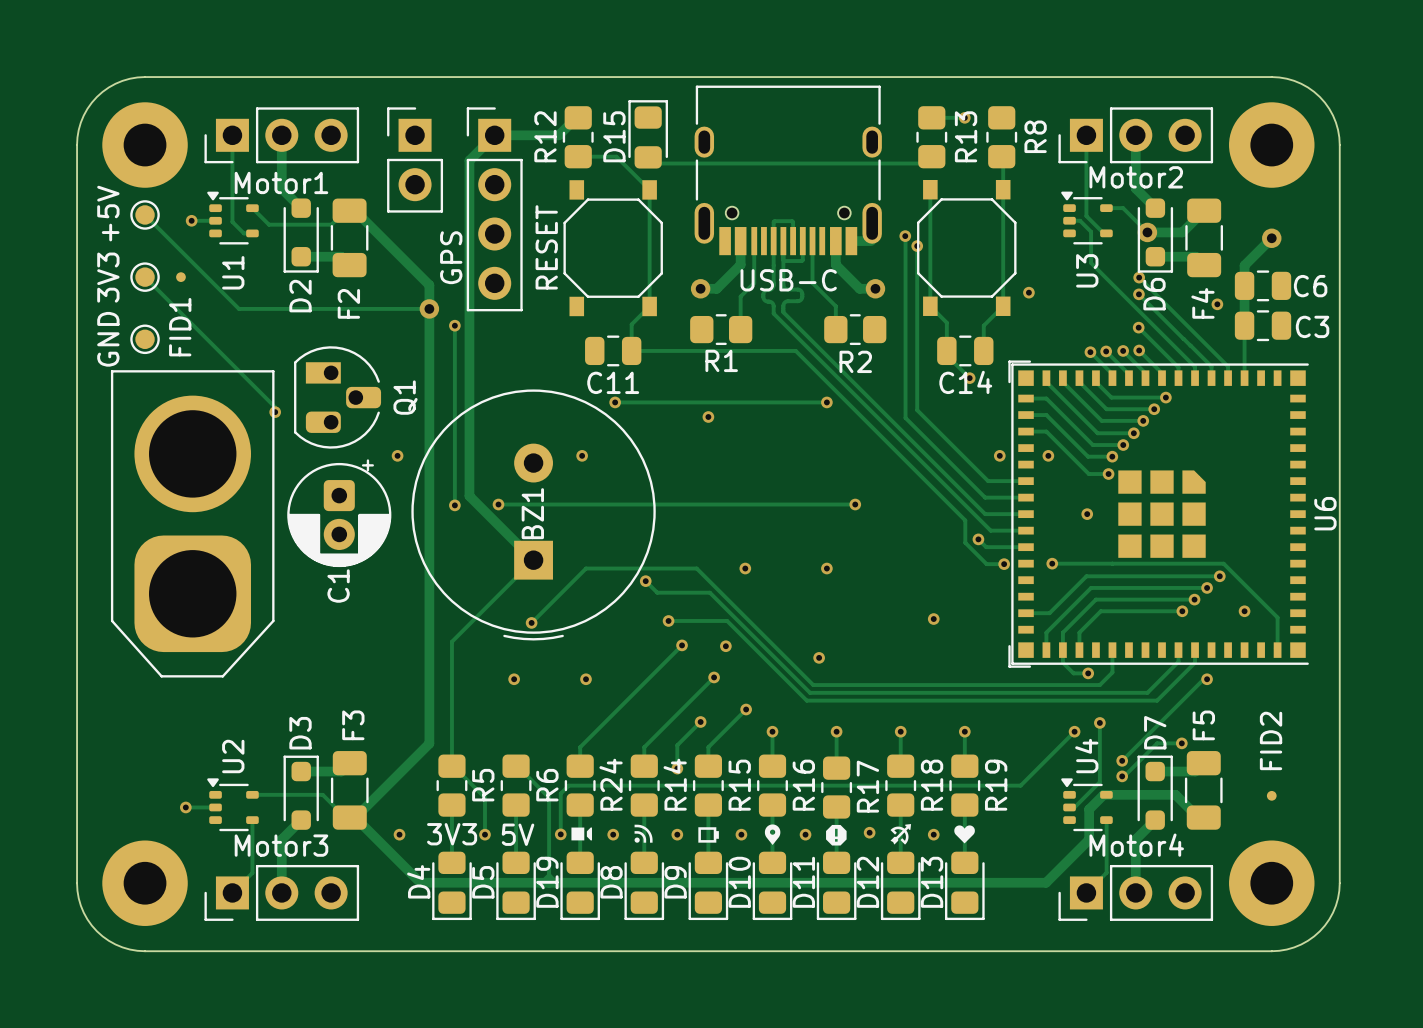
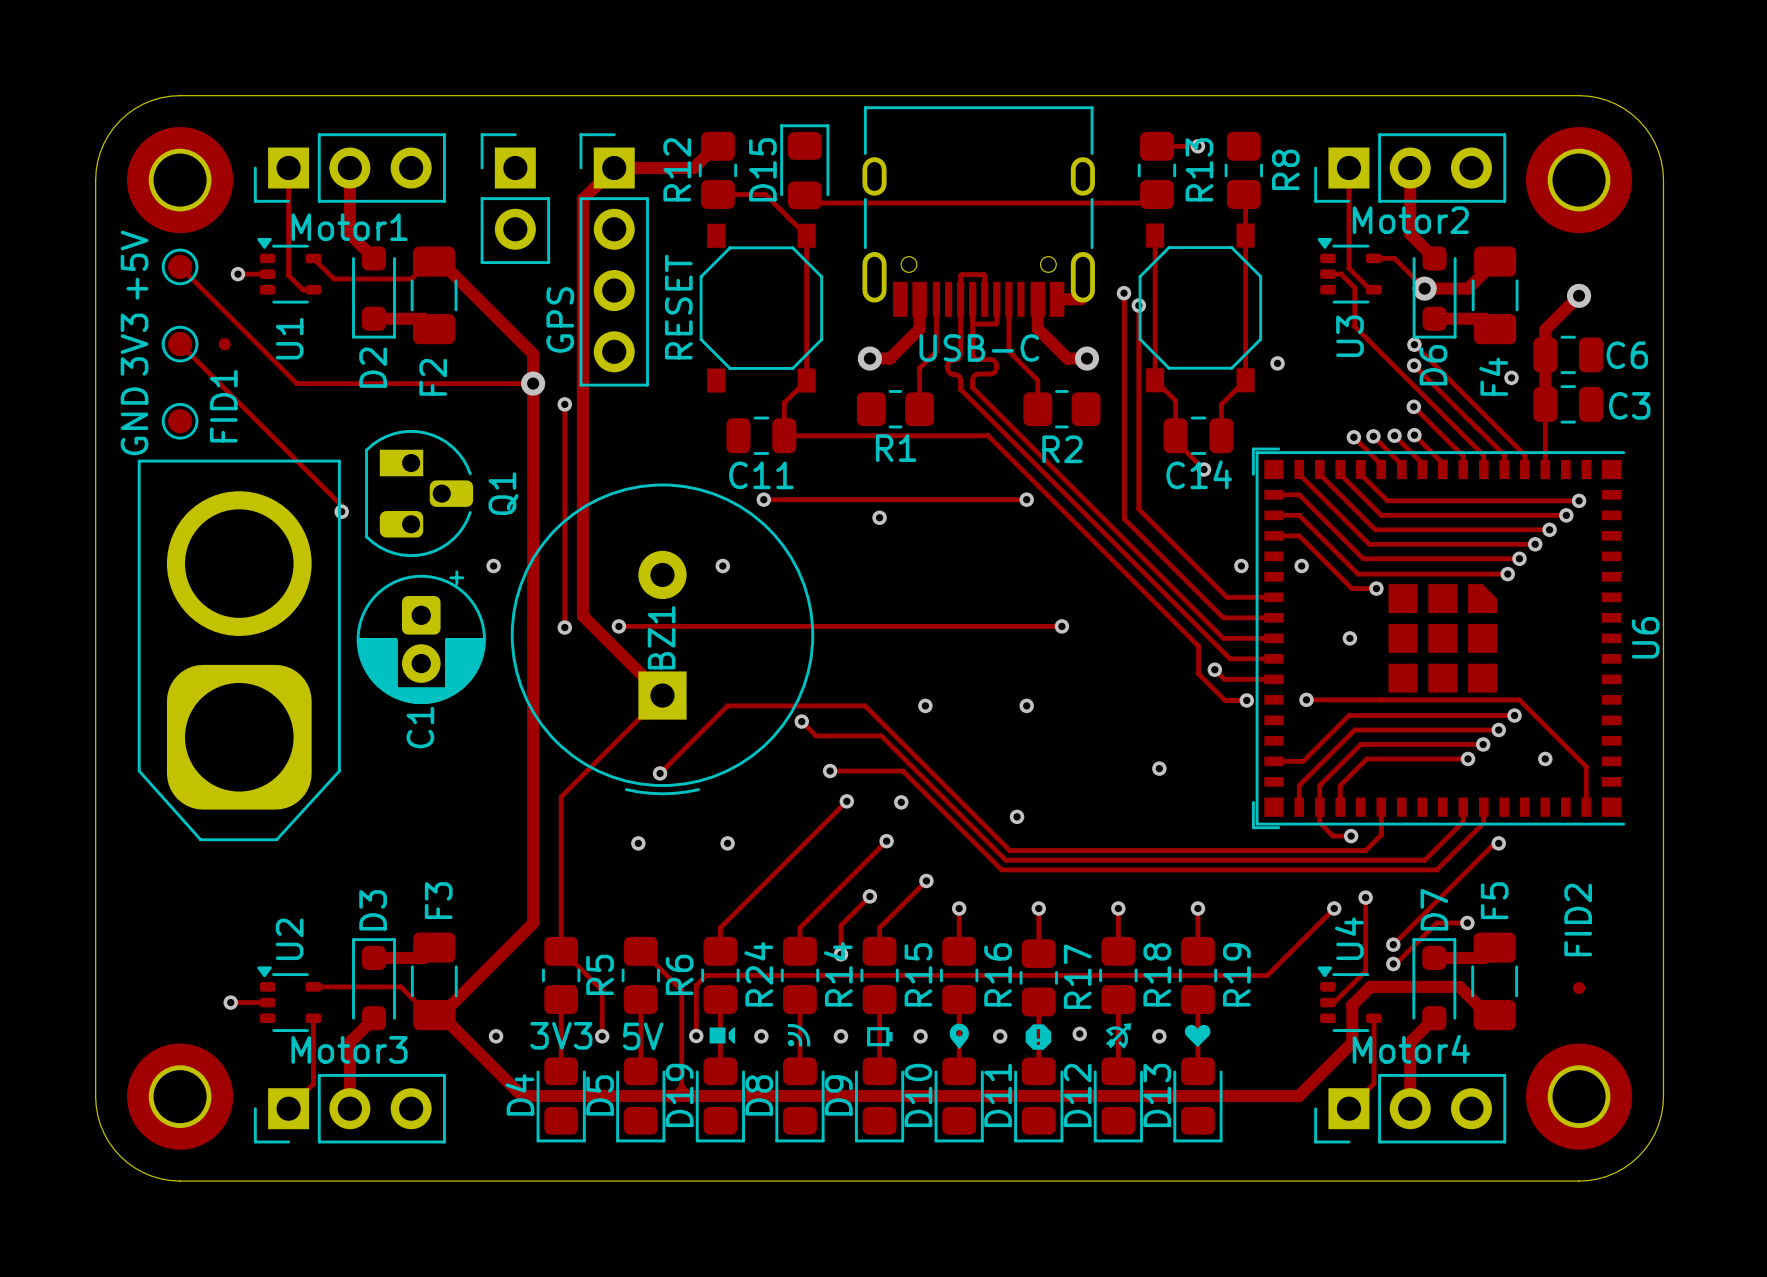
track: (1111, 397) (1165, 397) -> (1380, 493) (1387, 500) (1579, 500)
via: (1165, 397) -> none
via: none -> (1579, 500)
track: (1106, 409) (1151, 409) (1154, 412) (1154, 409) -> (1374, 508) (1381, 515) (1566, 515)
via: (1154, 409) -> none
via: none -> (1566, 515)
track: (1101, 420) (1139, 420) (1143, 424) (1143, 420) -> (1368, 522) (1375, 529) (1549, 529)
via: (1143, 420) -> none
via: none -> (1549, 529)
track: (1097, 433) (1133, 433) -> (1362, 537) (1369, 544) (1535, 544)
via: (1133, 433) -> none
via: none -> (1535, 544)
track: (1092, 445) (1123, 445) -> (1356, 552) (1363, 558) (1519, 558)
via: (1123, 445) -> none
via: none -> (1519, 558)
track: (1088, 456) (1112, 456) -> (1350, 567) (1358, 574) (1507, 574)
via: (1112, 456) -> none
via: none -> (1507, 574)

